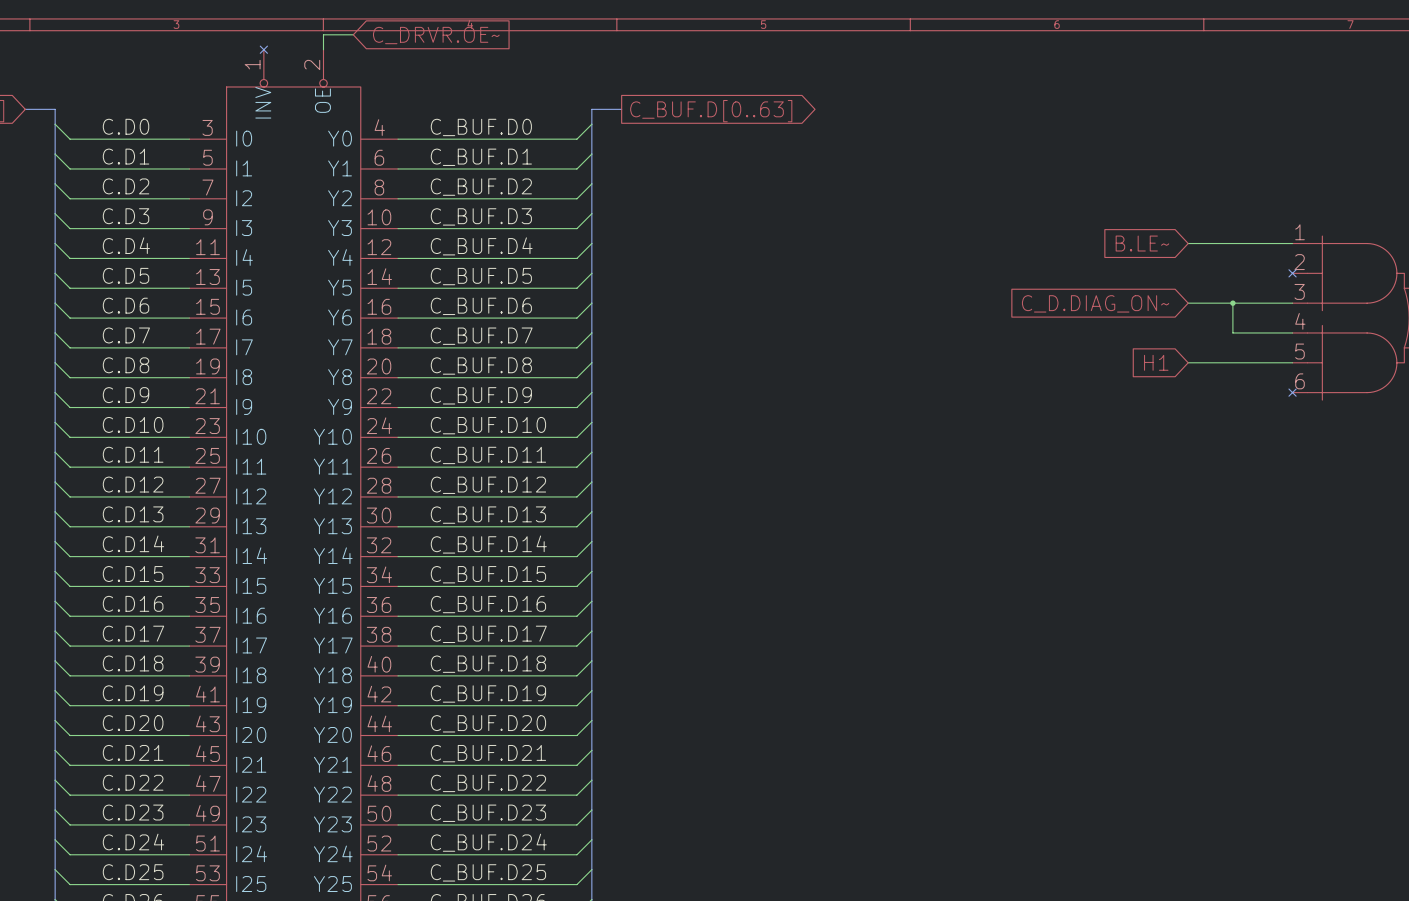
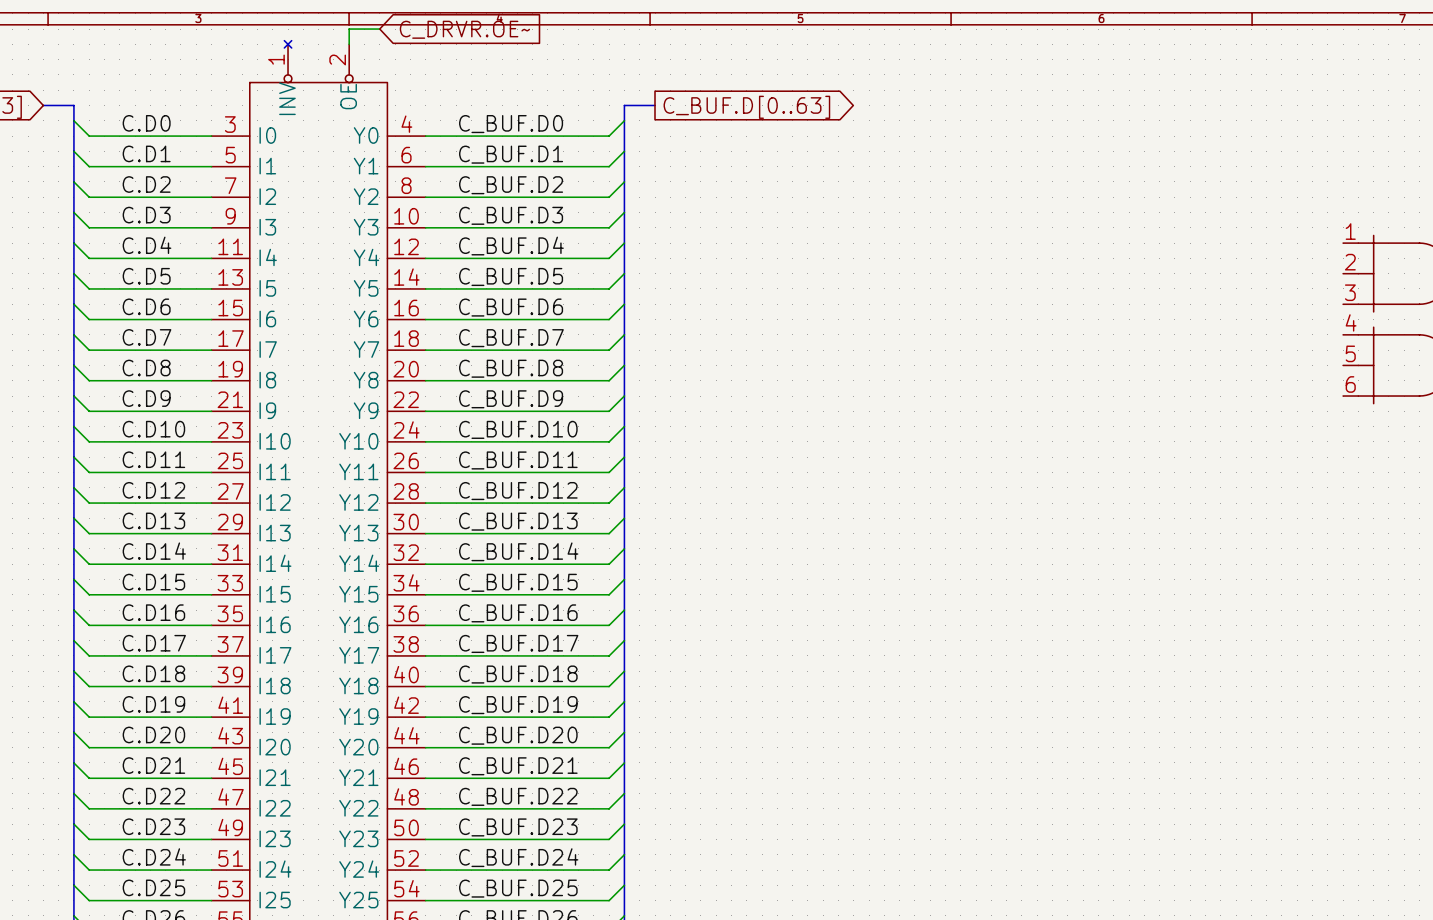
global label: B.LE~ (1142, 243) -> none
wire: (1188, 243) (1292, 243) -> none
no-connect mark: (1292, 273) -> none
global label: C_D.DIAG_ON~ (1095, 303) -> none
wire: (1188, 303) (1292, 303) -> none
wire: (1232, 303) (1232, 332) (1292, 332) -> none
junction: (1232, 303) -> none
global label: H1 (1156, 362) -> none
wire: (1188, 362) (1292, 362) -> none
no-connect mark: (1292, 392) -> none

